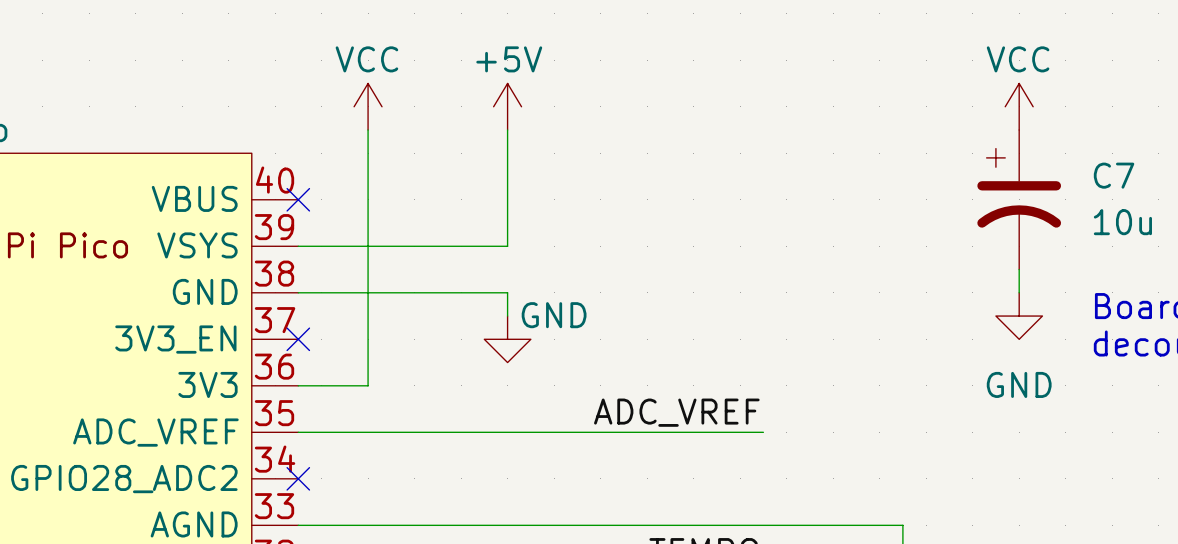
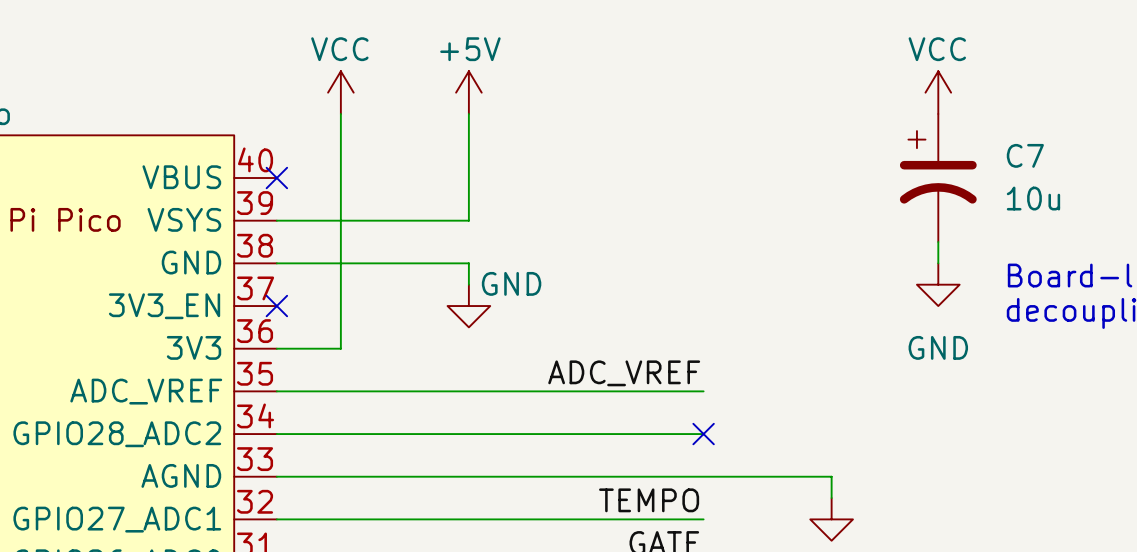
wire: none -> (276, 434) (703, 434)
no-connect mark: (298, 478) -> none
no-connect mark: none -> (703, 434)

